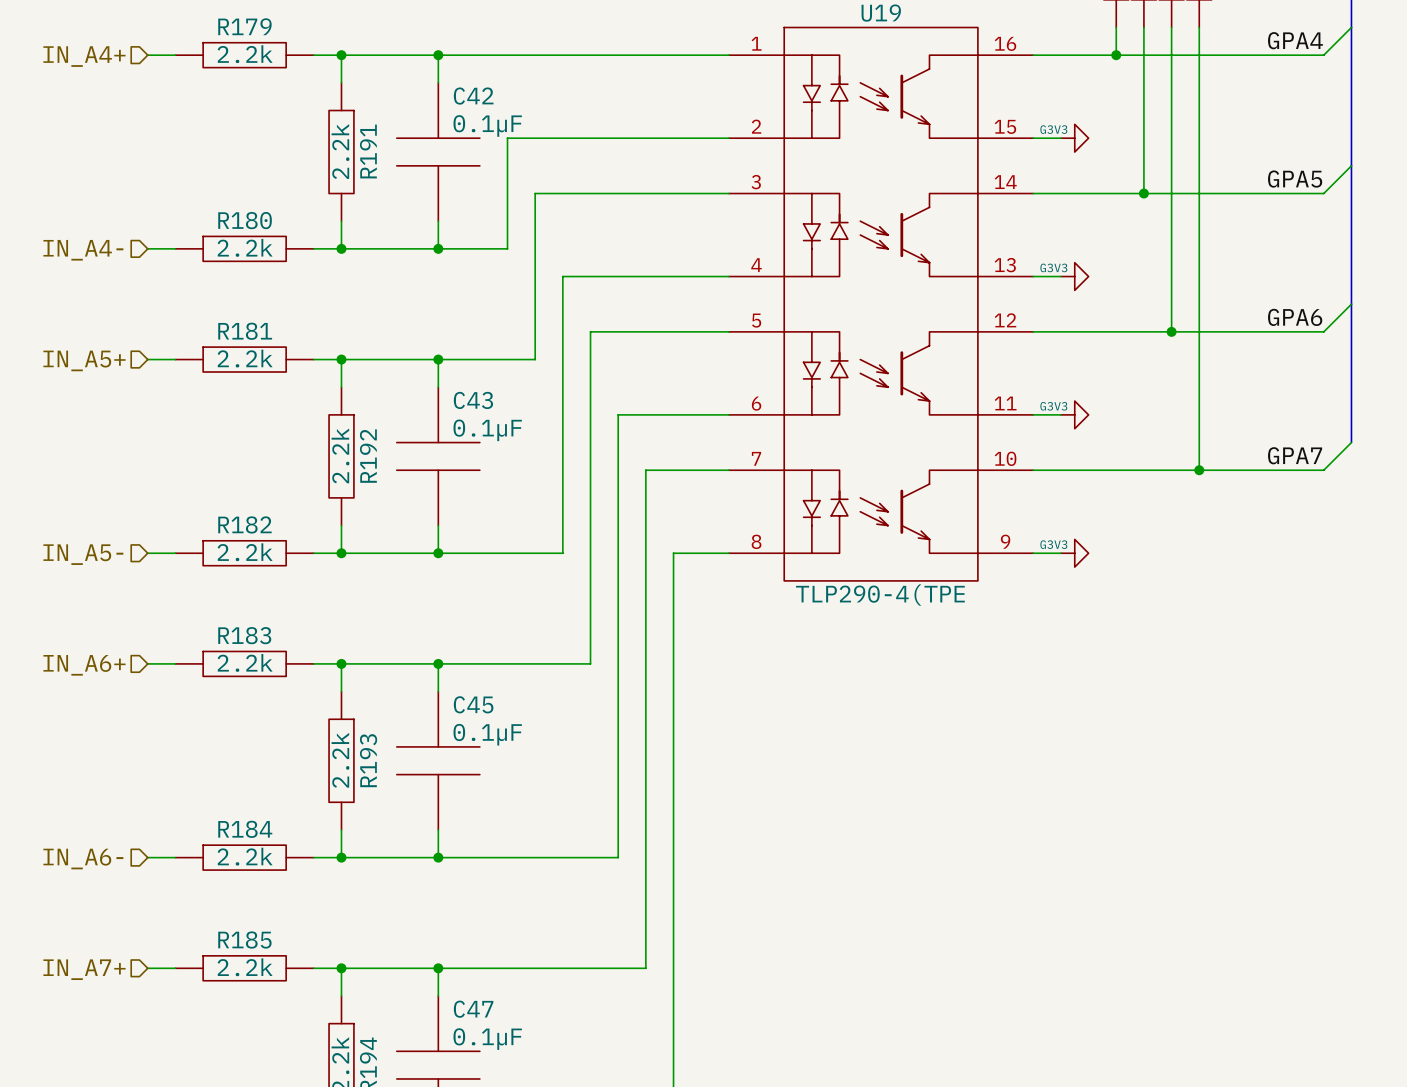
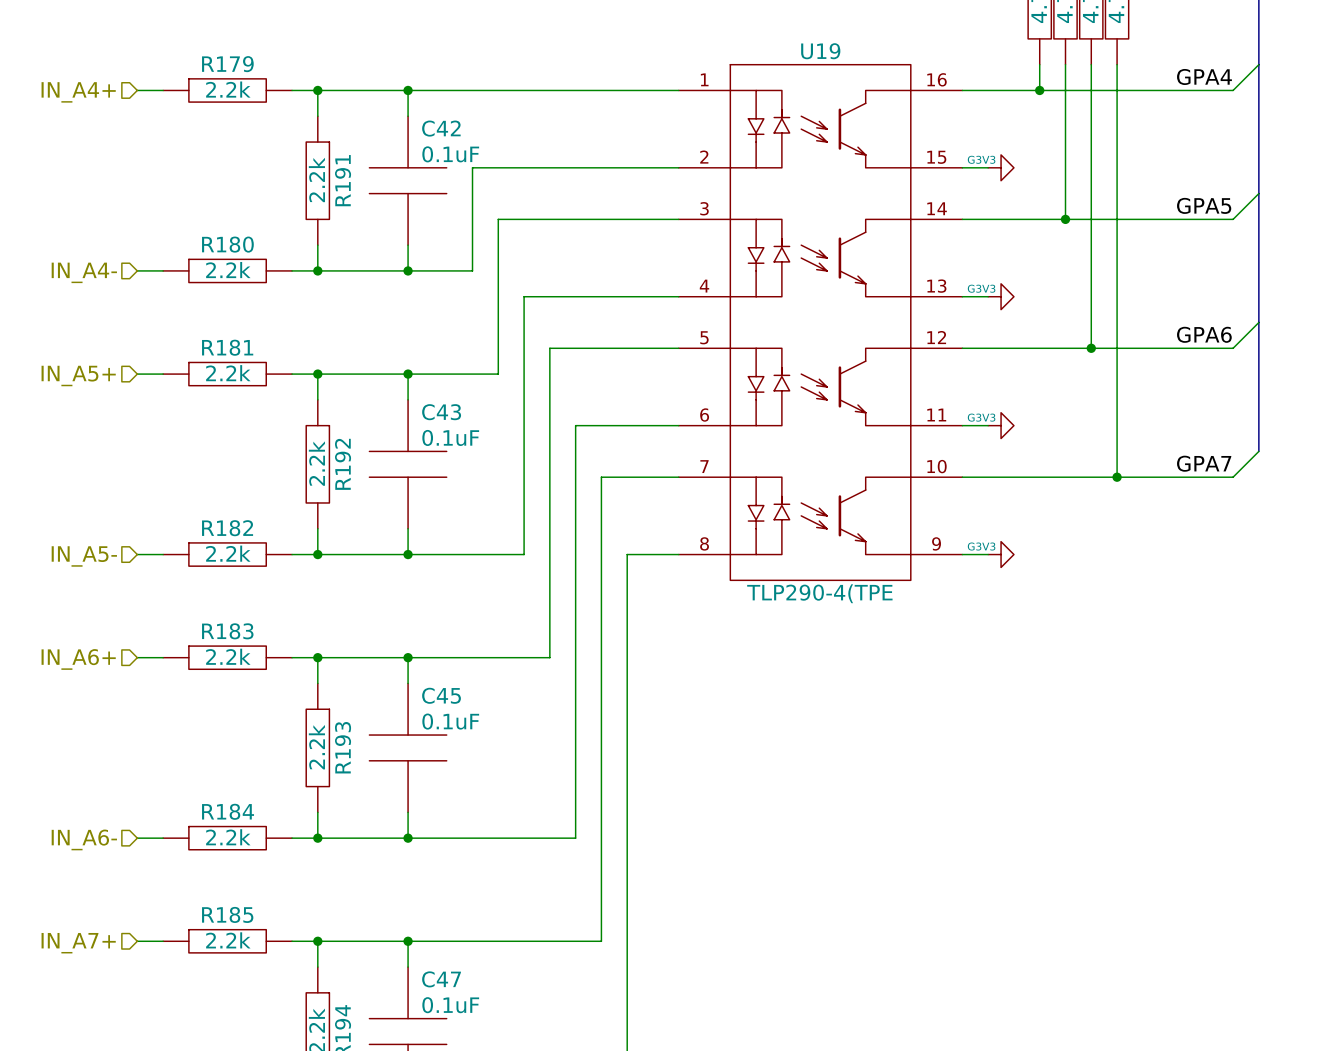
C42 text: 0.1µF (487, 125) -> 0.1uF (450, 154)
C43 text: 0.1µF (487, 430) -> 0.1uF (450, 437)
C45 text: 0.1µF (487, 734) -> 0.1uF (450, 721)
C47 text: 0.1µF (487, 1039) -> 0.1uF (450, 1005)

